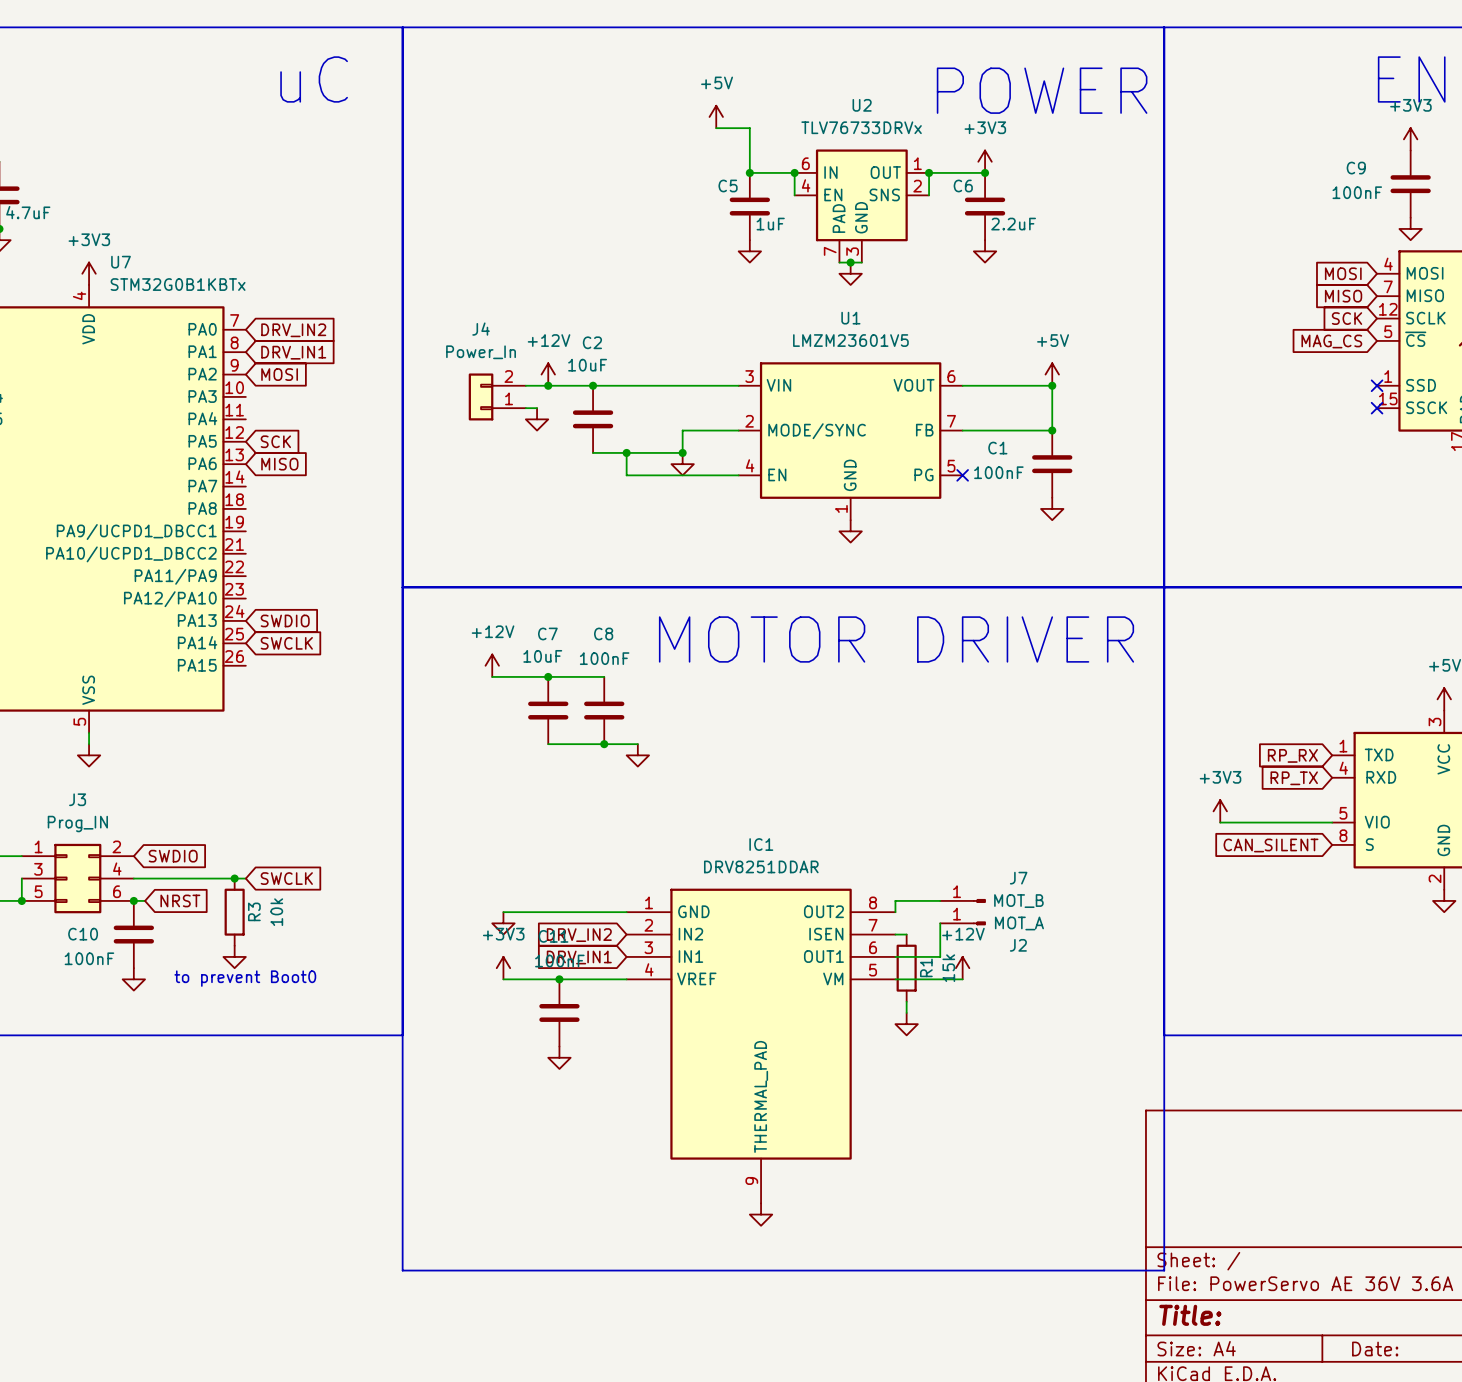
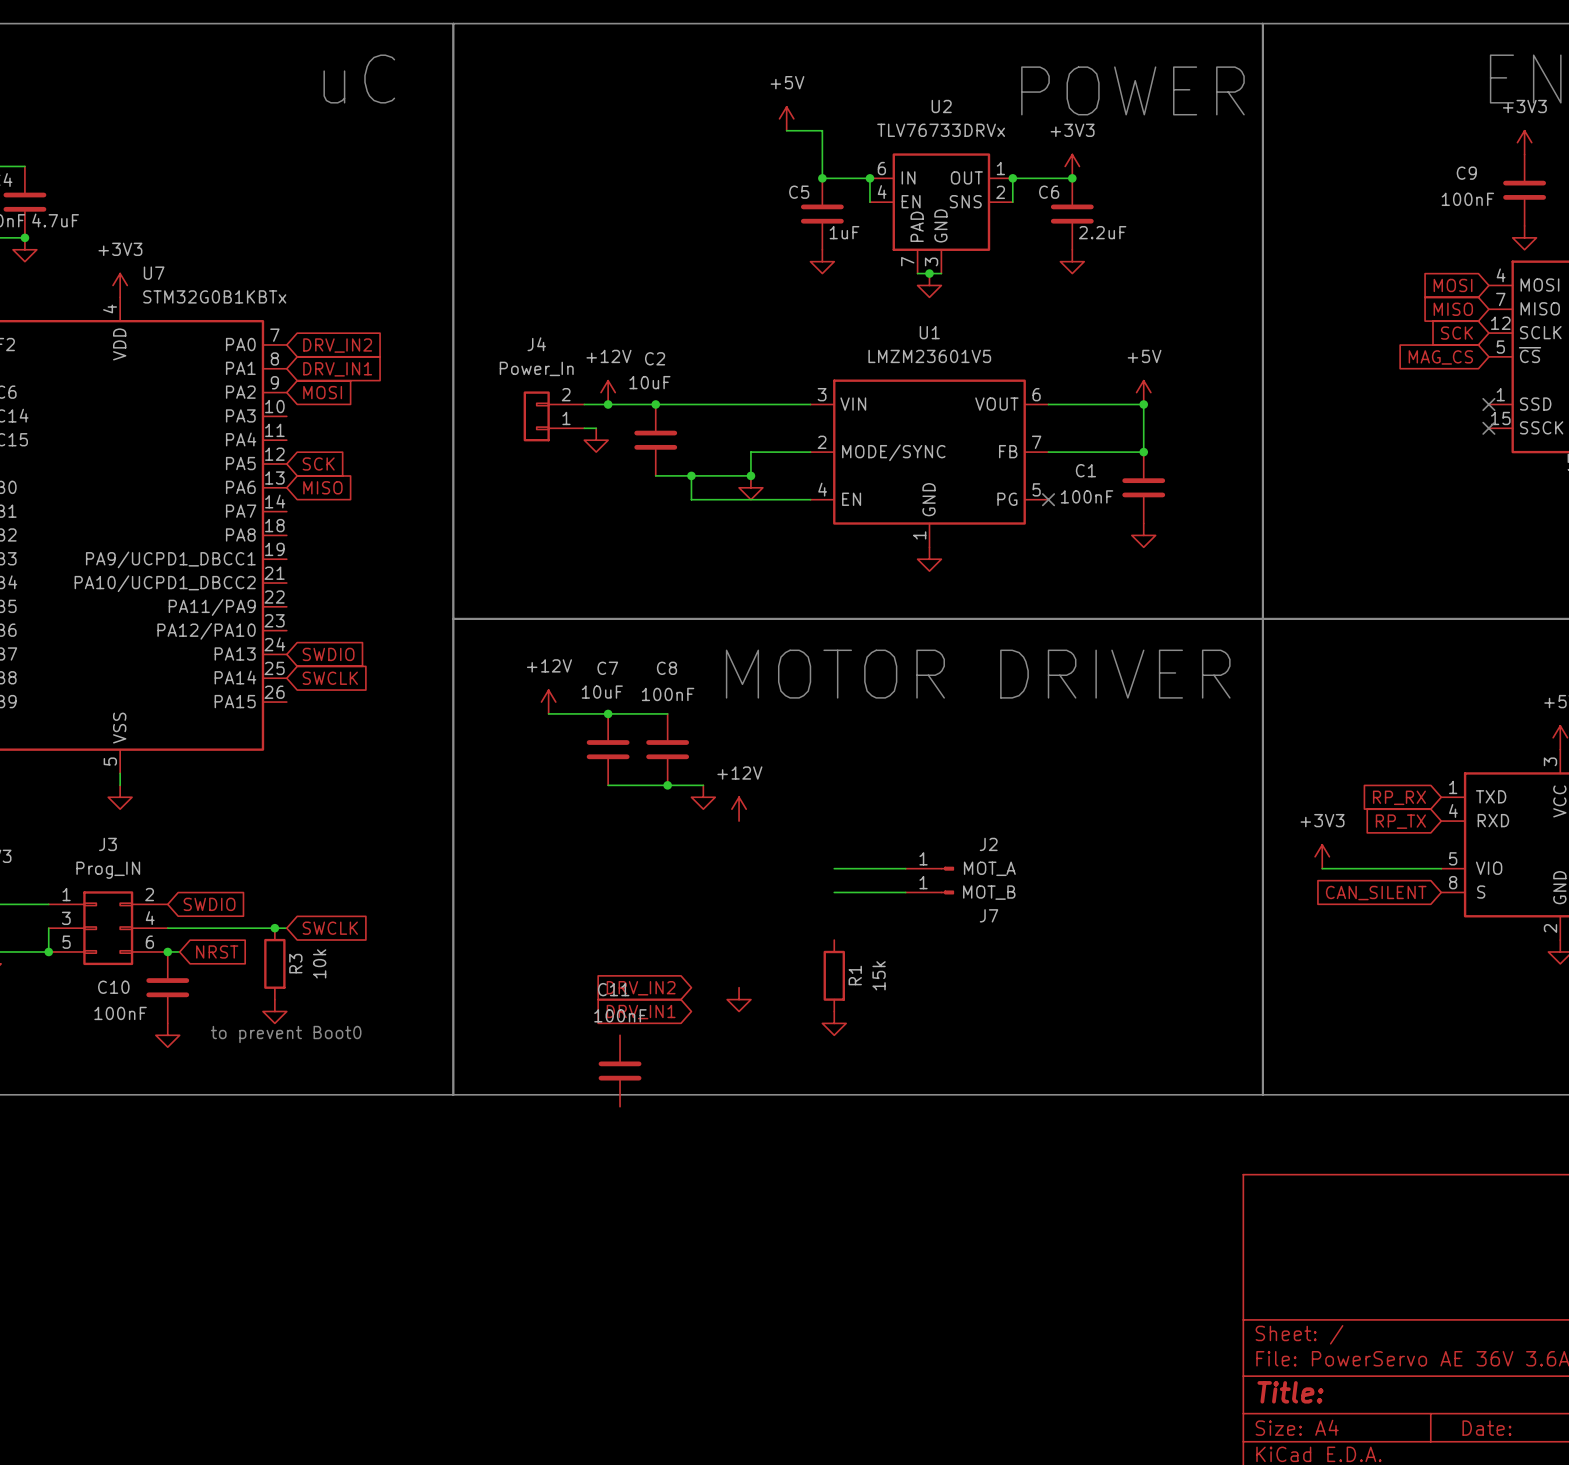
power symbol: none -> +12V (739, 809)
wire: none -> (834, 868) (905, 868)
J7 name position: J7 (1018, 878) -> J7 (989, 915)
wire: (940, 900) (895, 900) (895, 912) -> none
J7 position: (962, 900) -> (929, 892)
wire: (503, 912) (626, 912) -> none
power symbol: (503, 923) -> none
wire: (940, 923) (940, 956) (895, 956) -> none
J2 position: (962, 923) -> (929, 868)
wire: (895, 934) (906, 934) -> none
power symbol: none -> (739, 999)
J2 name position: J2 (1018, 945) -> J2 (988, 844)
power symbol: +3V3 (503, 968) -> none
power symbol: none -> (834, 1023)
R1 position: (906, 968) -> (834, 975)
power symbol: +12V (962, 968) -> none
wire: (503, 979) (626, 979) -> none
junction: (559, 979) -> none
wire: (895, 979) (962, 979) -> (834, 892) (905, 892)
wire: (906, 1001) (906, 1012) -> none
power symbol: (906, 1024) -> none
line: (402, 1035) (402, 1270) (1164, 1270) (1164, 1035) -> (453, 1094) (1262, 1094)
IC1: DRV8251DDAR (761, 1046) -> none
power symbol: (559, 1057) -> none
power symbol: (761, 1214) -> none

